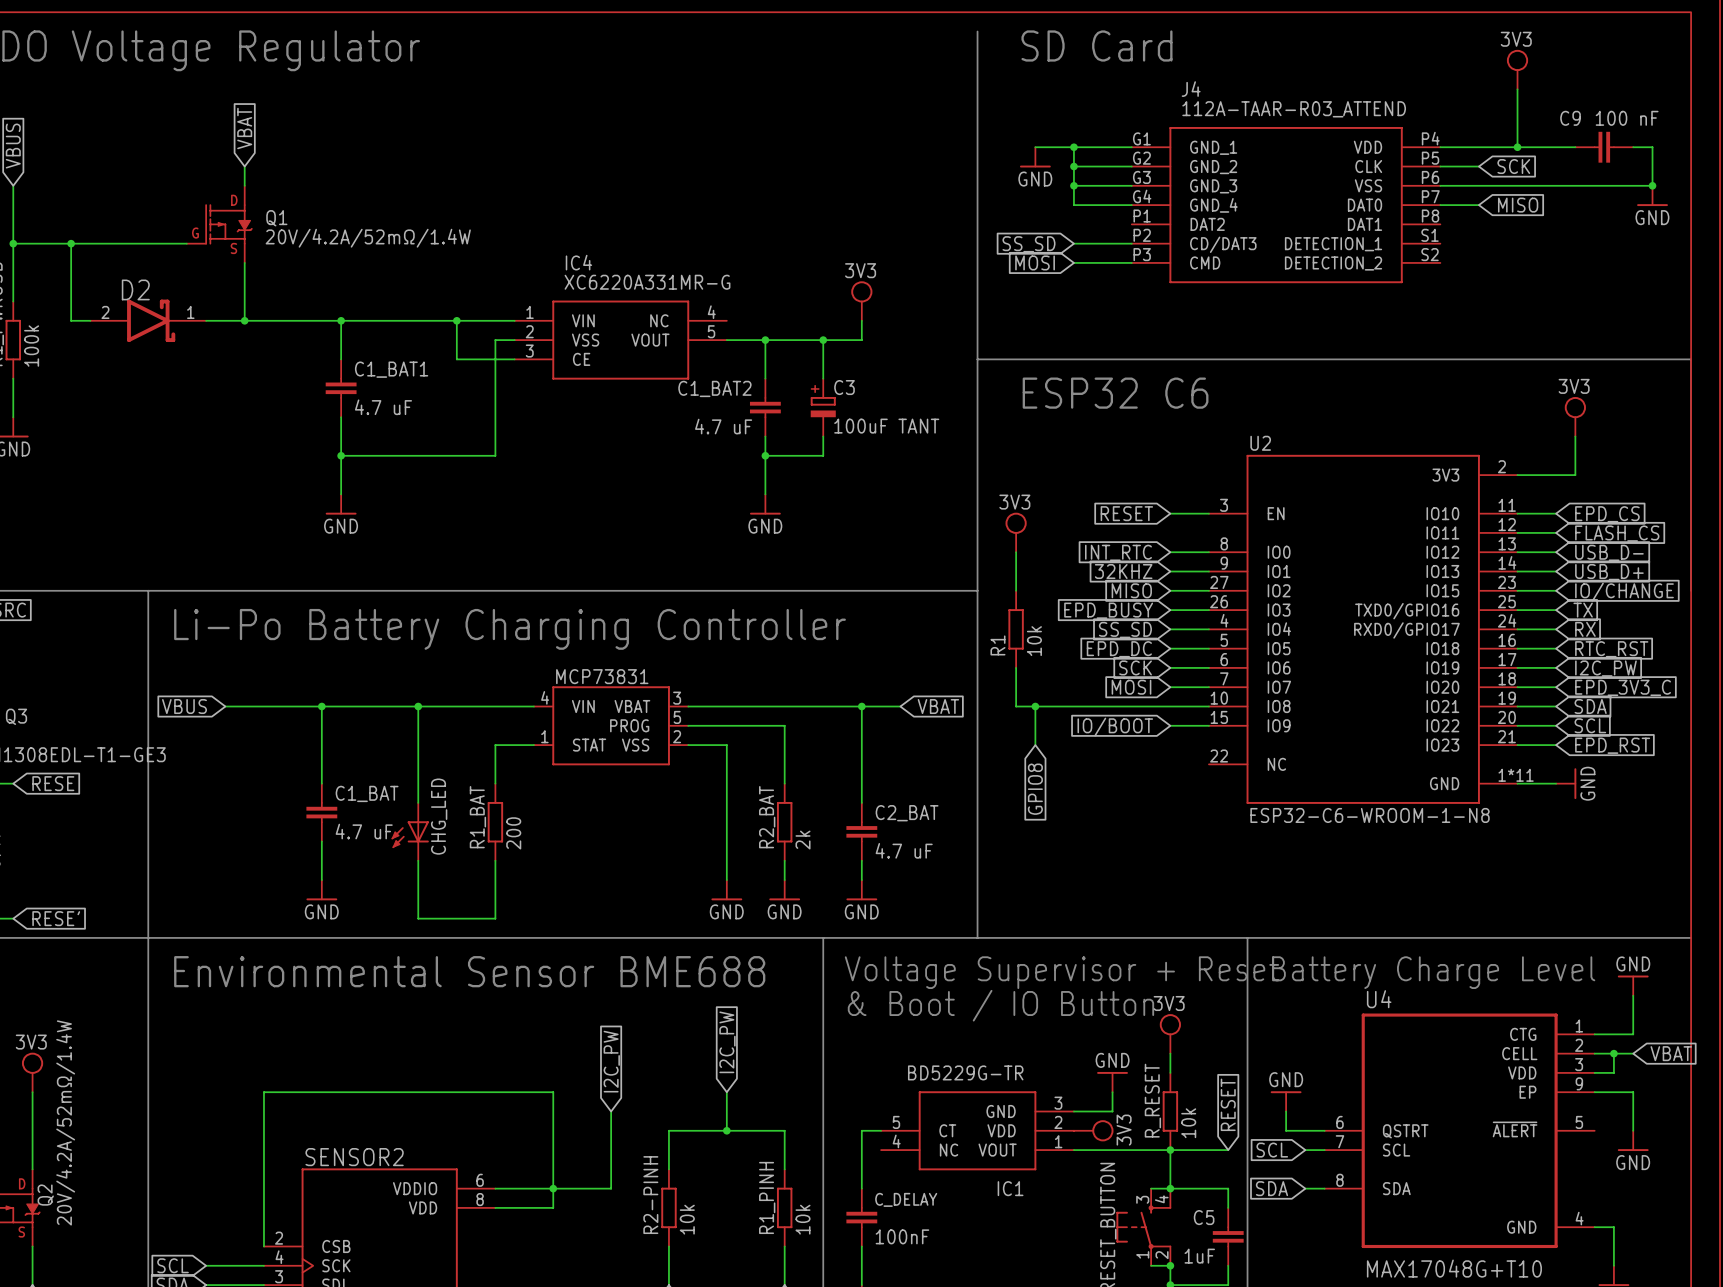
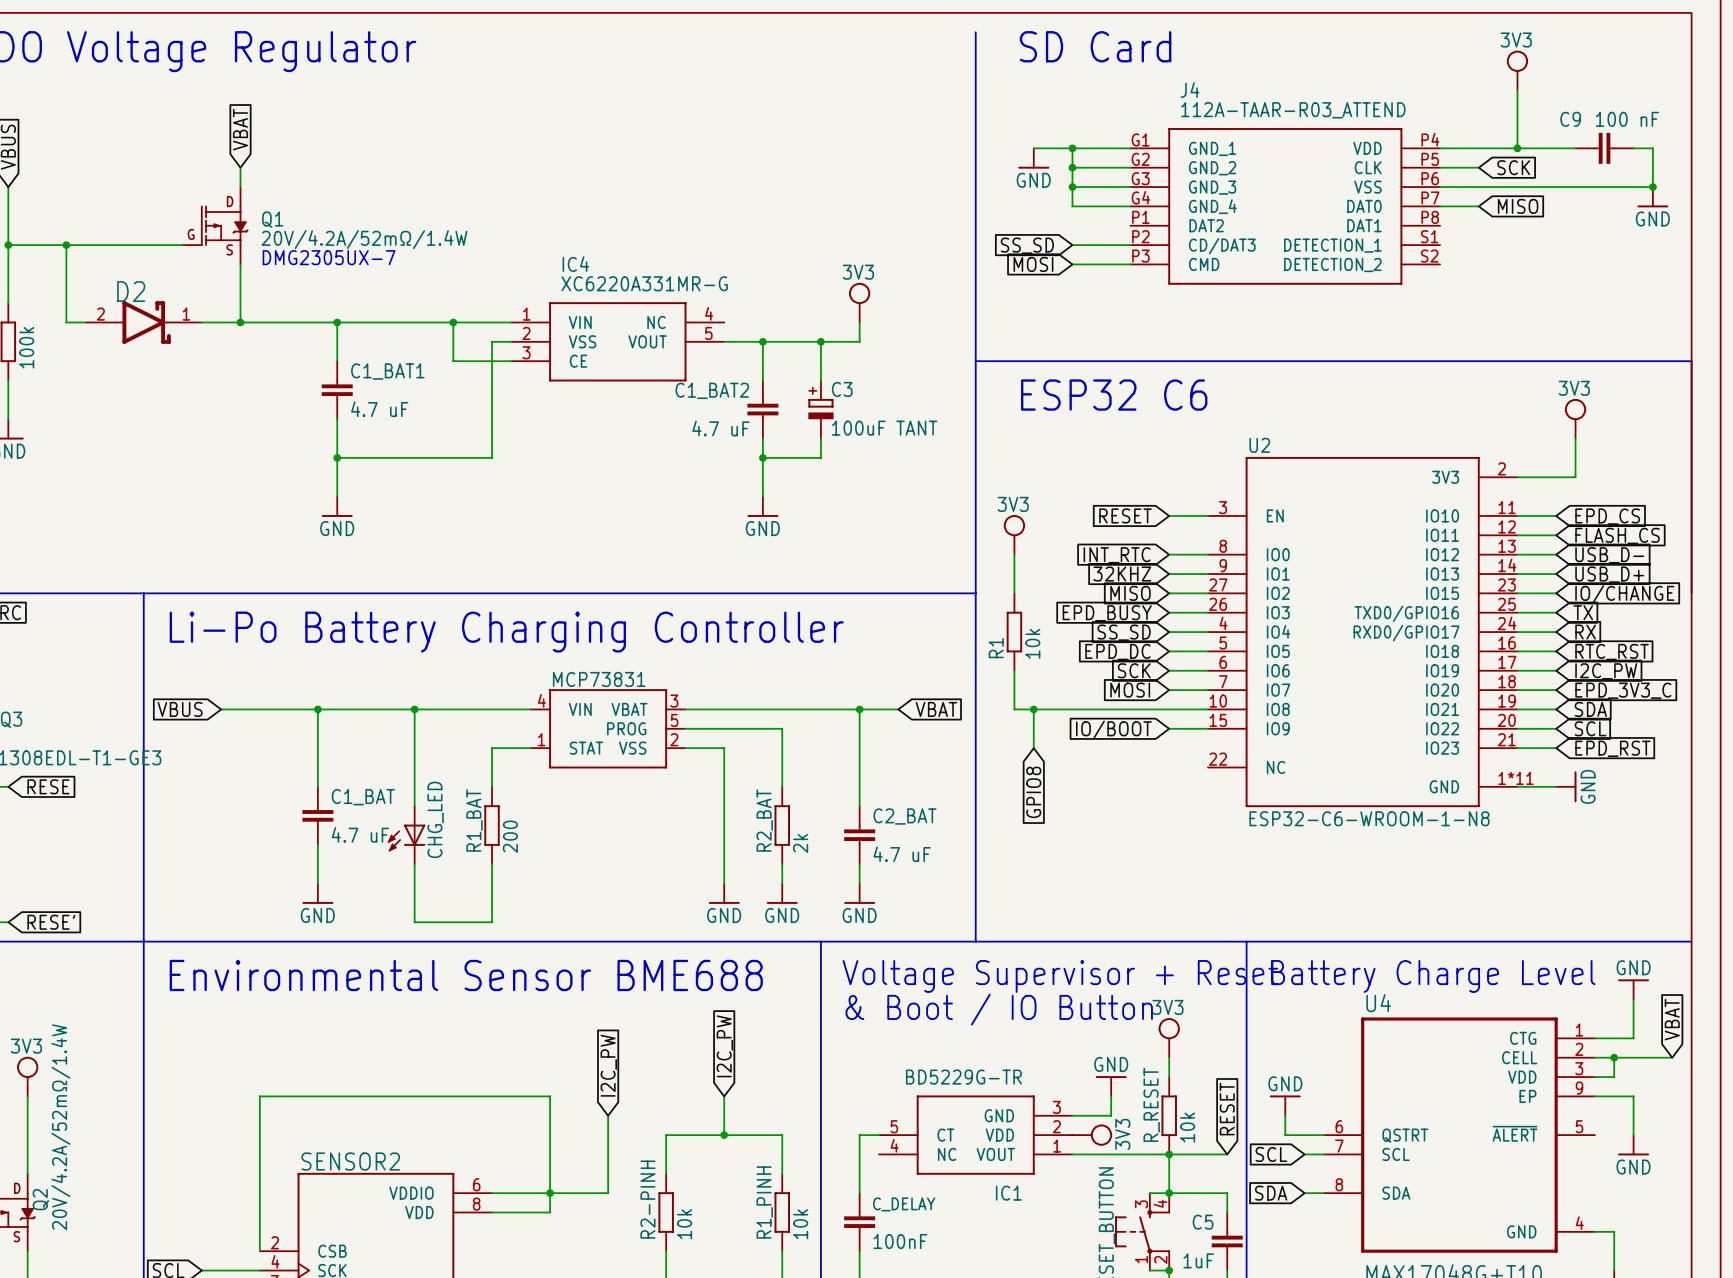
text: none -> DMG2305UX-7 (329, 257)
wire: none -> (1633, 1057) (1672, 1057)
global label rotation: 0° (1671, 1053) -> 90° counterclockwise (1672, 1019)

